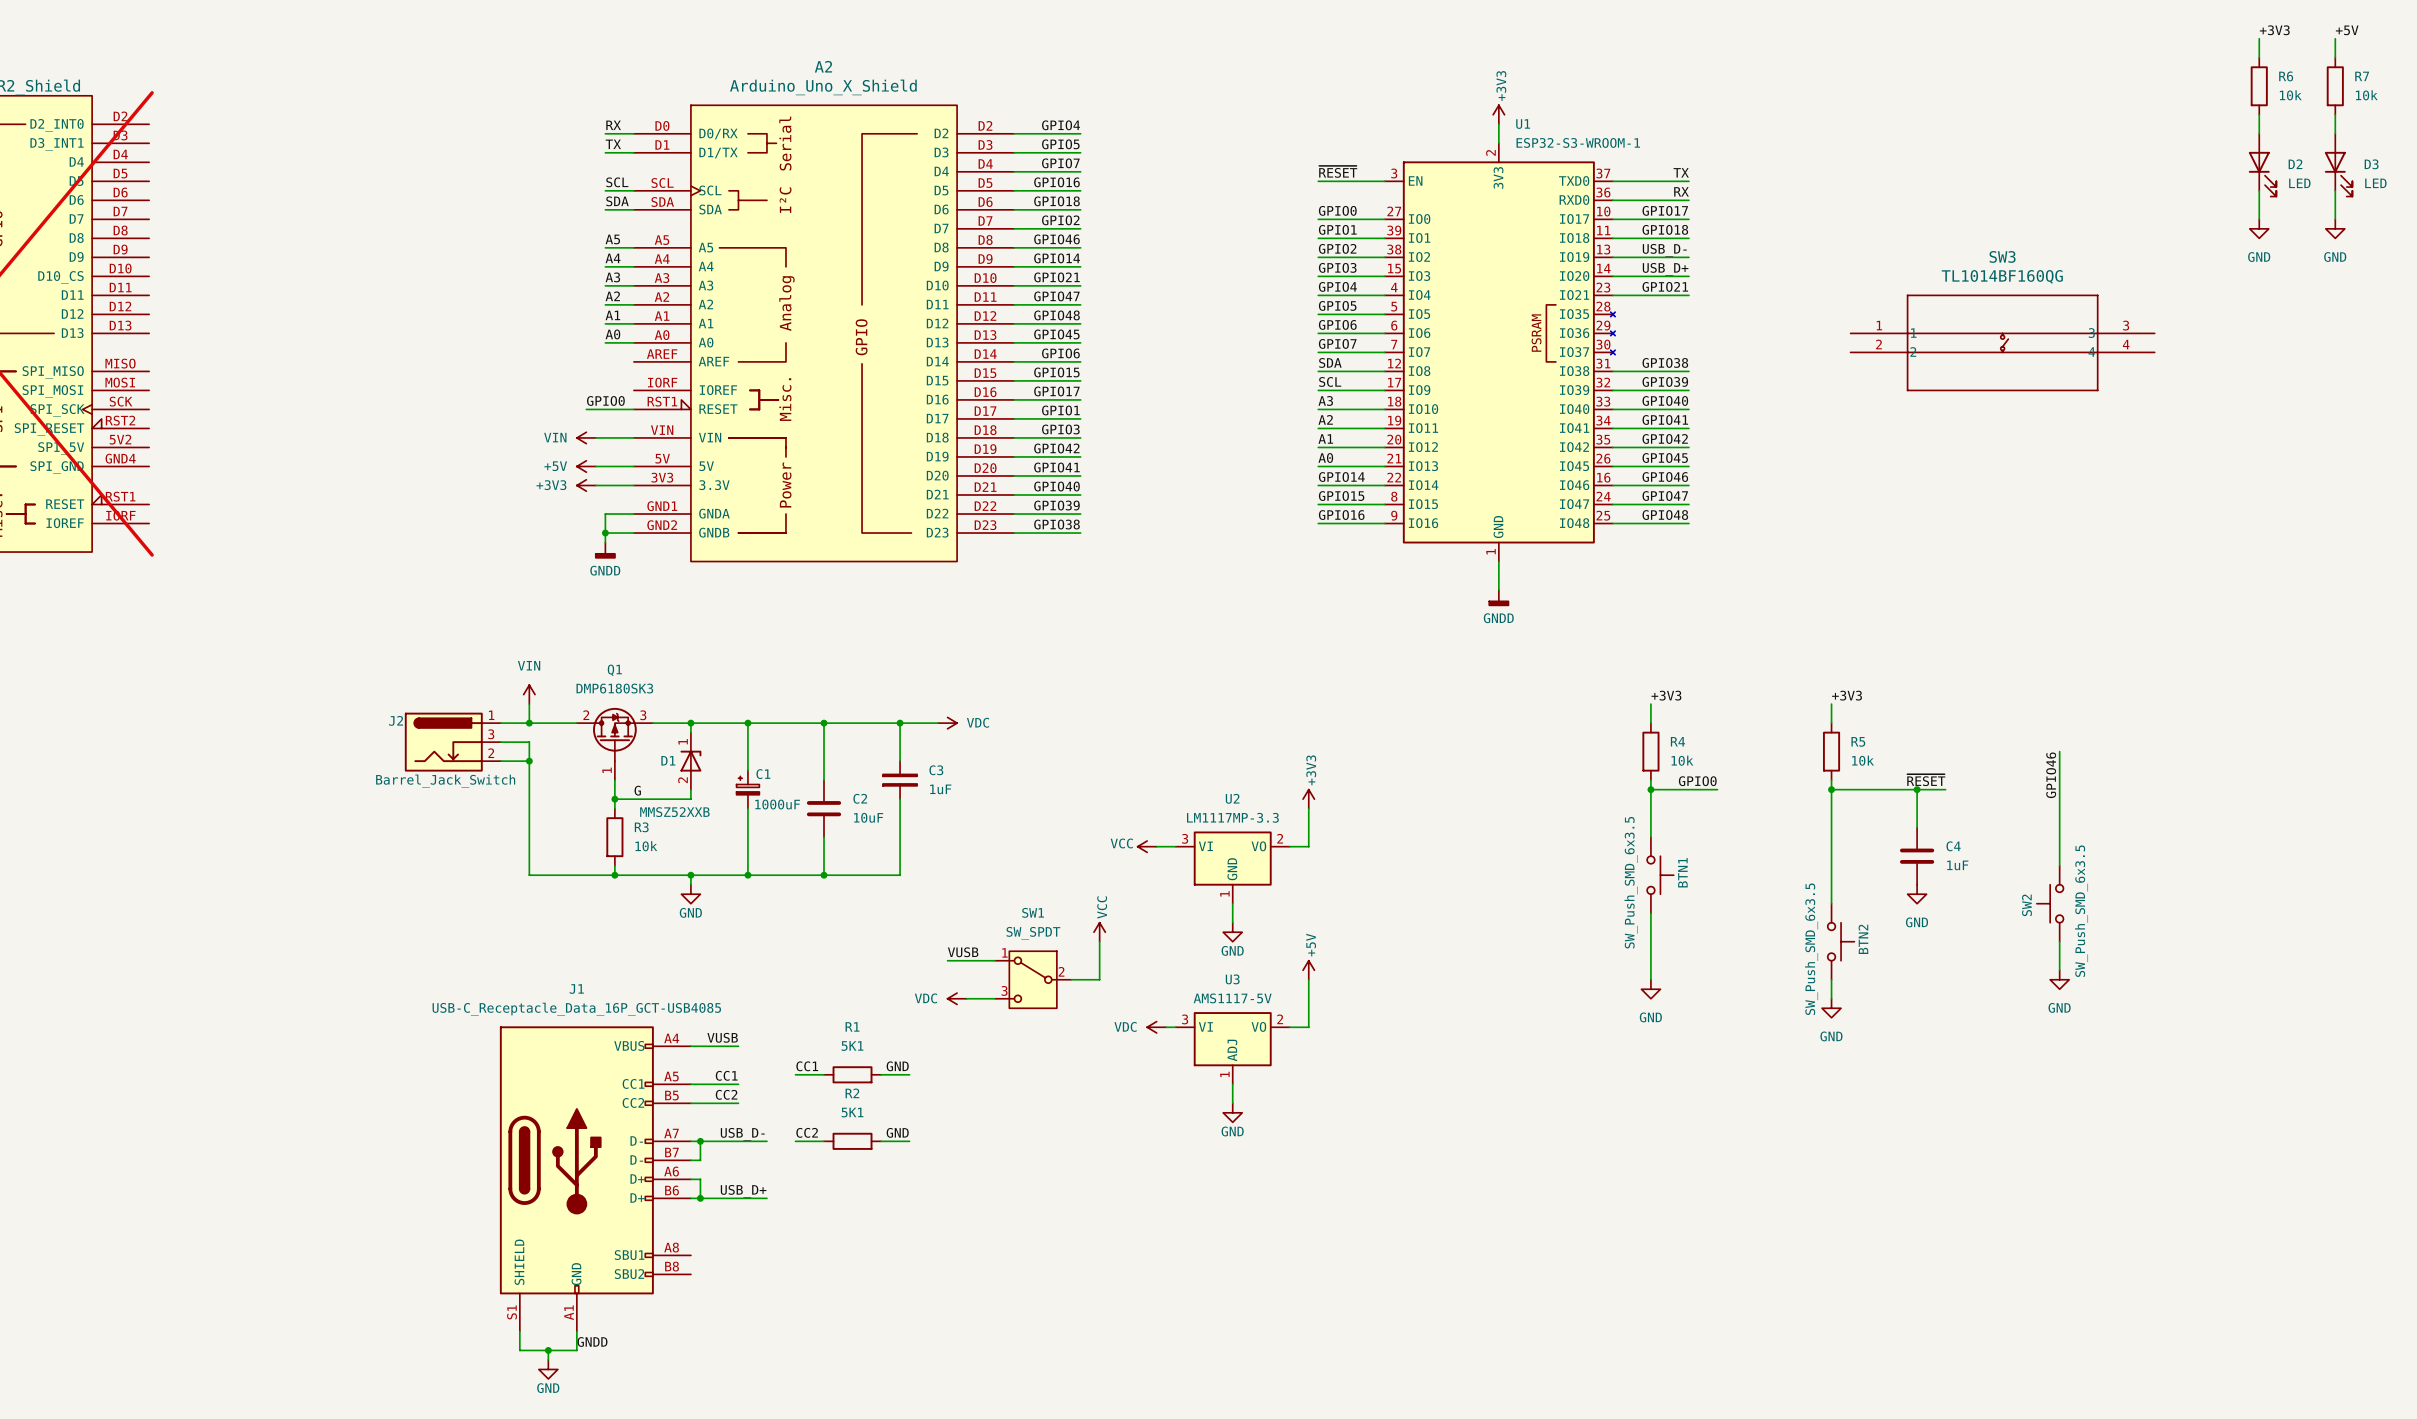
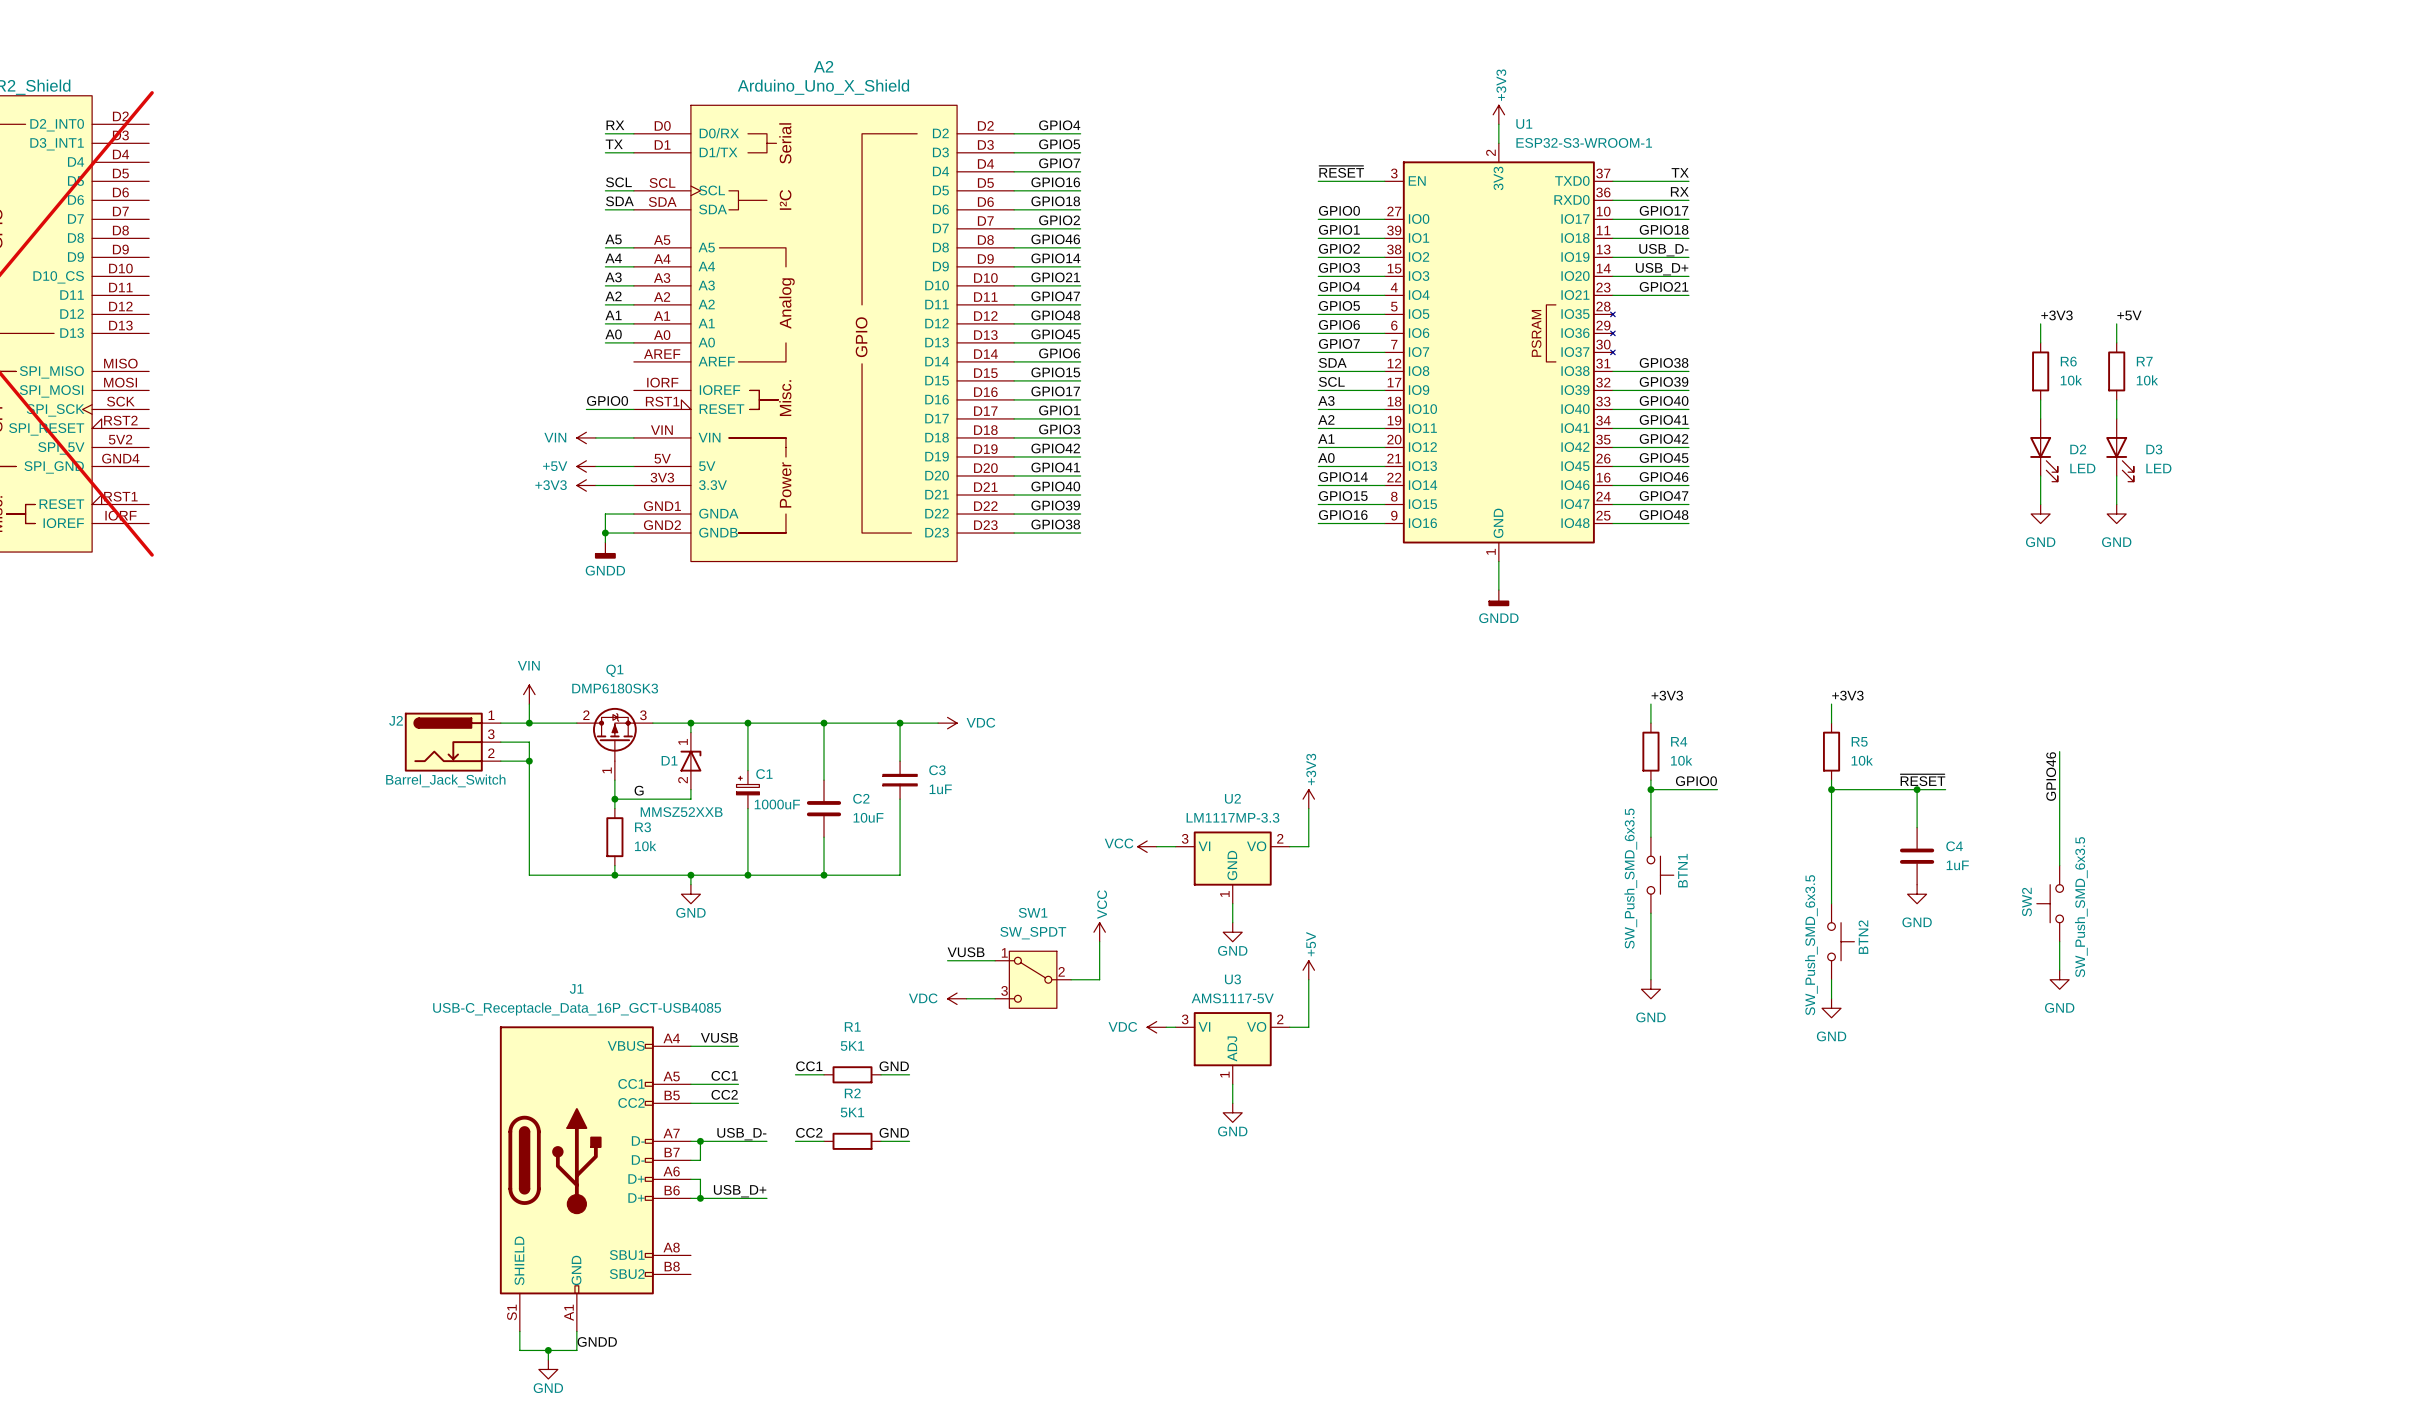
label: +3V3 (2274, 30) -> none
label: +5V (2347, 30) -> none
wire: (2259, 38) (2259, 57) -> none
wire: (2335, 38) (2335, 57) -> none
R6 position: (2259, 86) -> (2040, 371)
R7 position: (2335, 86) -> (2116, 371)
wire: (2259, 114) (2259, 133) -> none
wire: (2335, 114) (2335, 133) -> none
D2 position: (2262, 165) -> (2043, 450)
D3 position: (2338, 165) -> (2120, 450)
wire: (2259, 190) (2259, 219) -> none
wire: (2335, 190) (2335, 219) -> none
power symbol: GND (2259, 228) -> none
power symbol: GND (2335, 228) -> none
label: none -> +3V3 (2057, 315)
label: none -> +5V (2129, 315)
wire: none -> (2040, 323) (2040, 342)
wire: none -> (2116, 323) (2116, 342)
SW3: TL1014BF160QG (2002, 342) -> none
wire: none -> (2040, 399) (2040, 418)
wire: none -> (2116, 399) (2116, 418)
wire: none -> (2040, 475) (2040, 504)
wire: none -> (2116, 475) (2116, 504)
power symbol: none -> GND (2040, 514)
power symbol: none -> GND (2116, 514)

